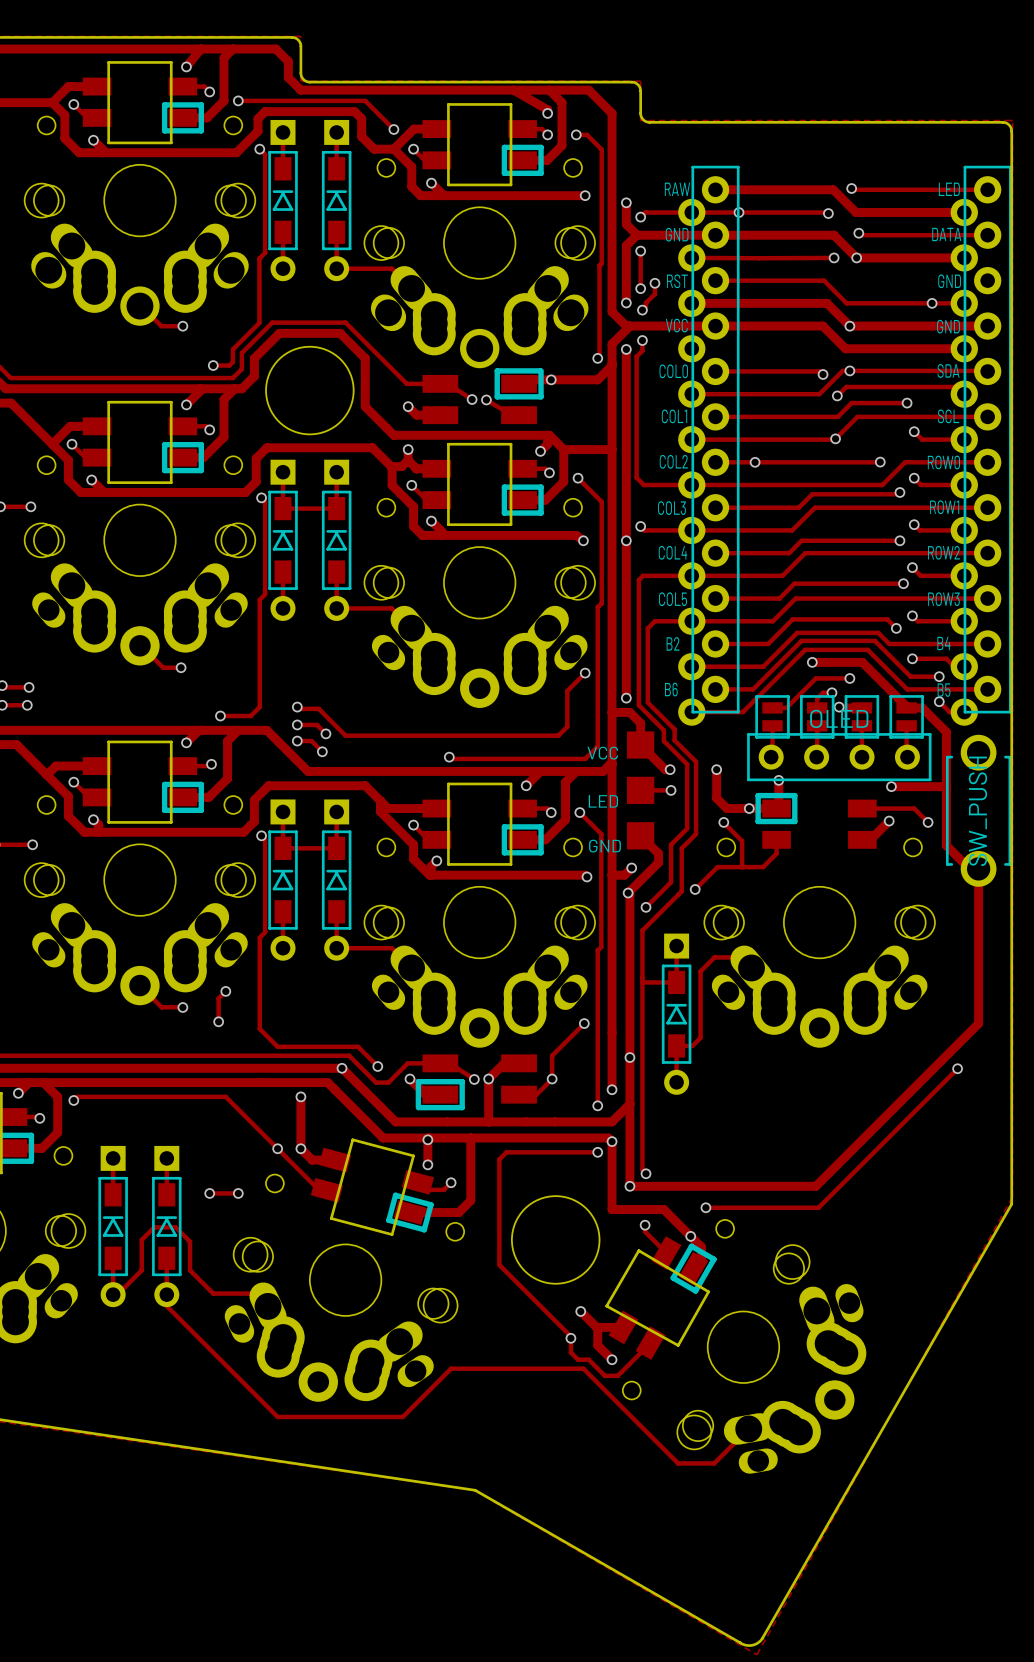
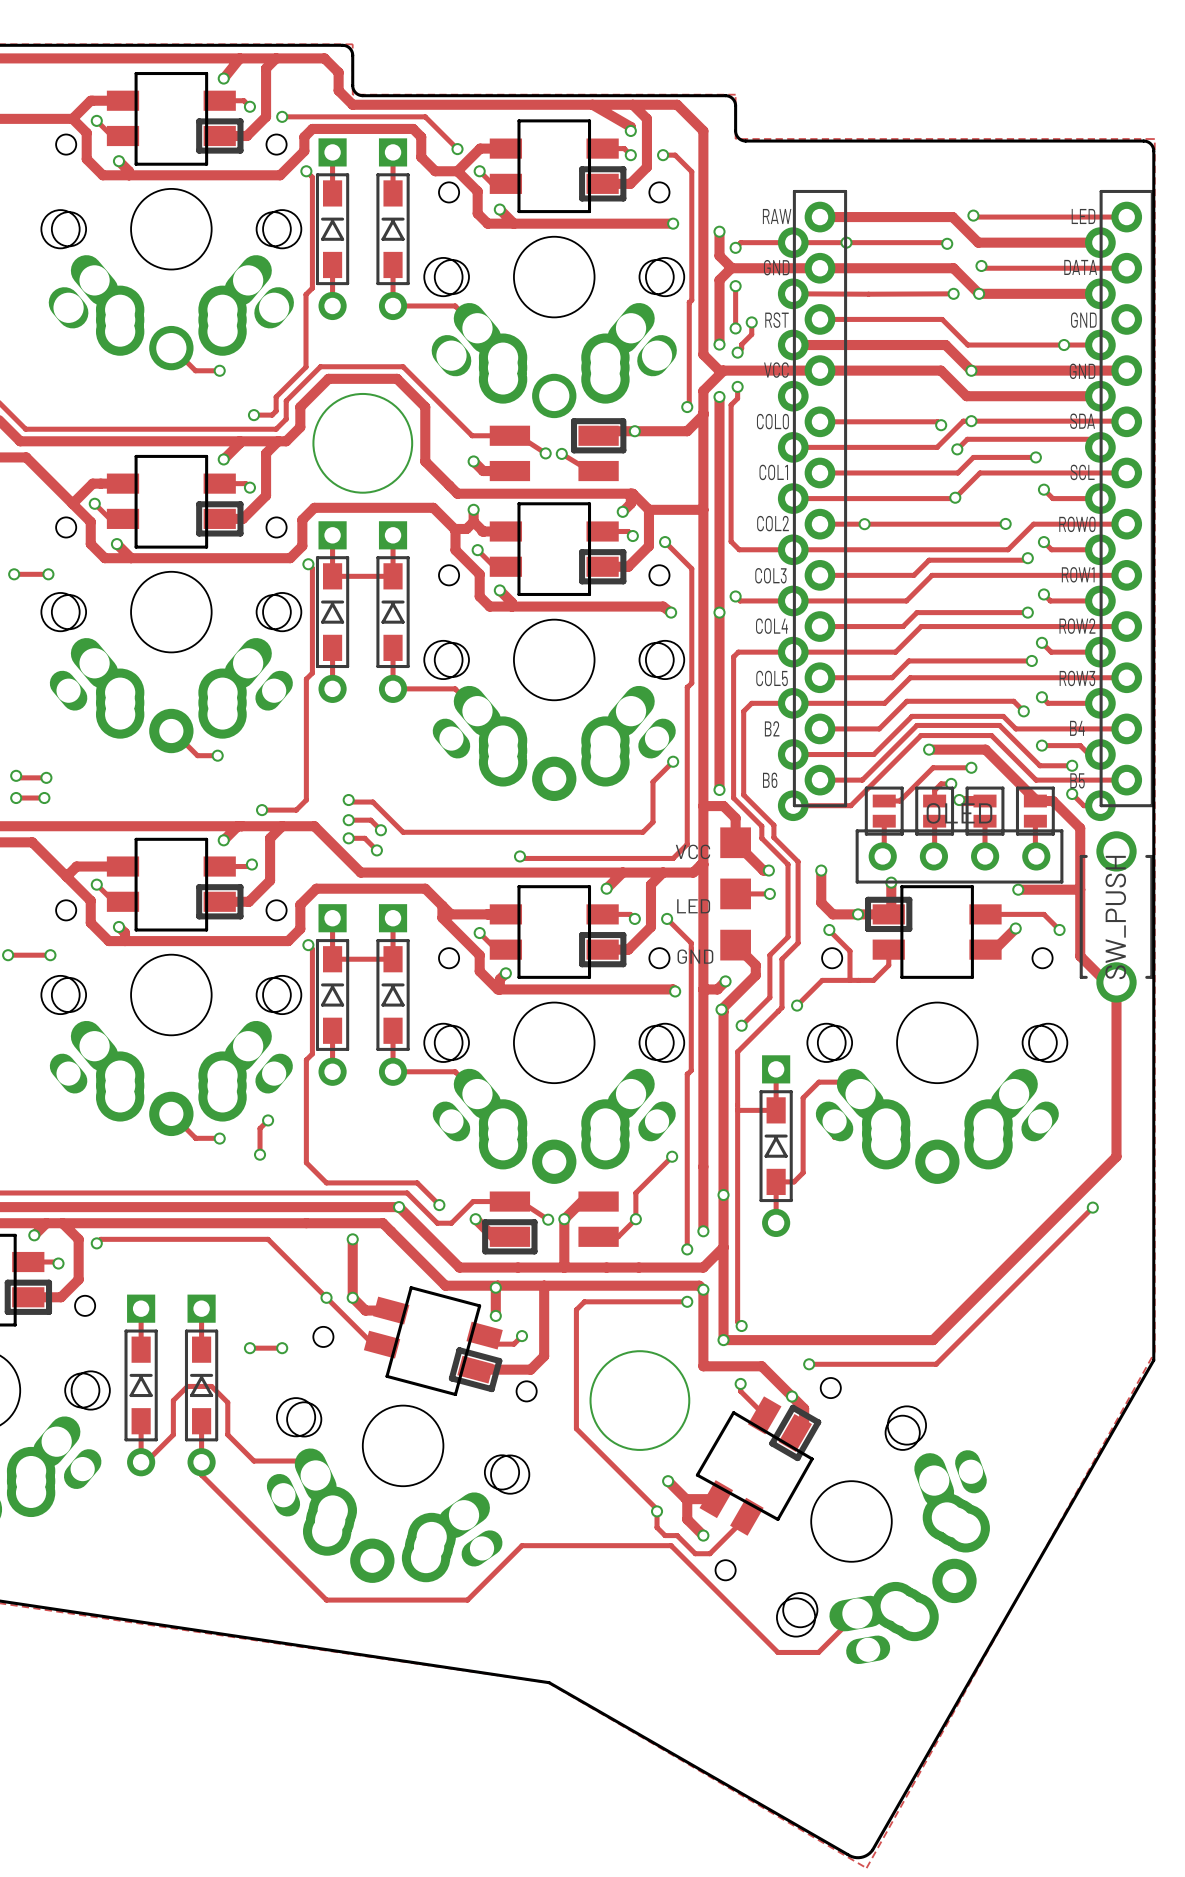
board edge: none -> (901, 886) (901, 977) (972, 977) (972, 886) (901, 886)

